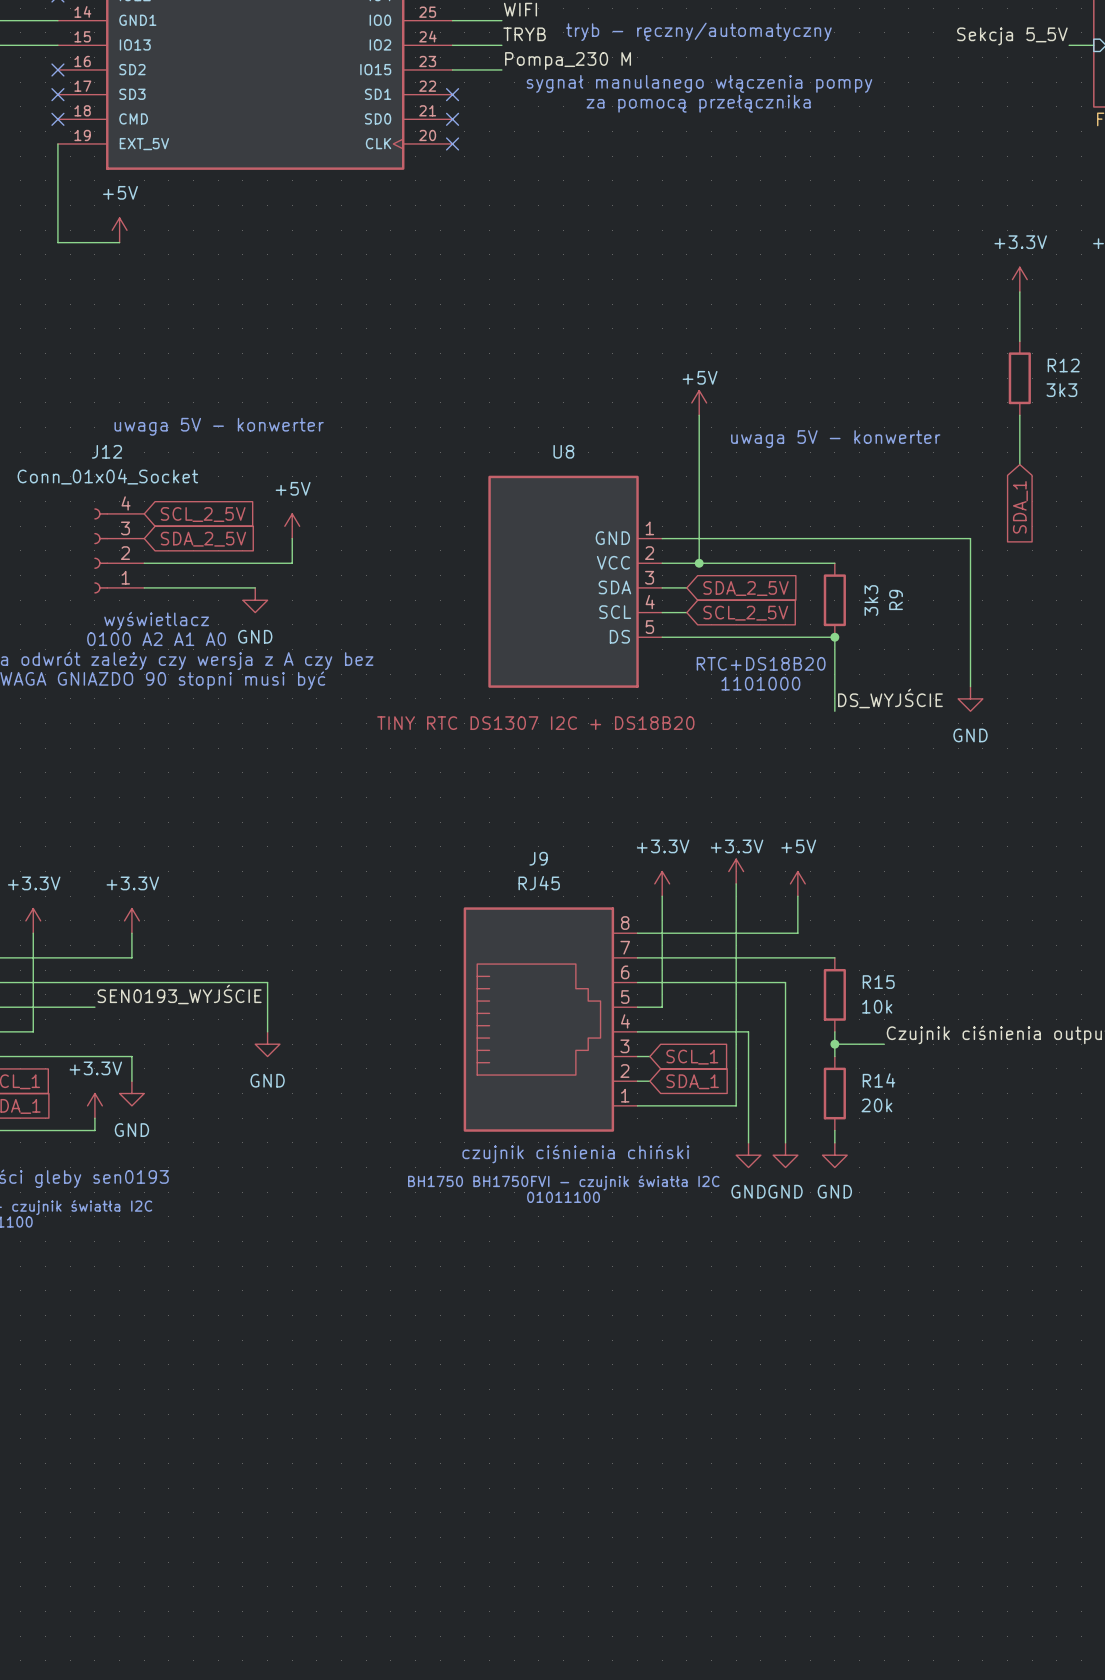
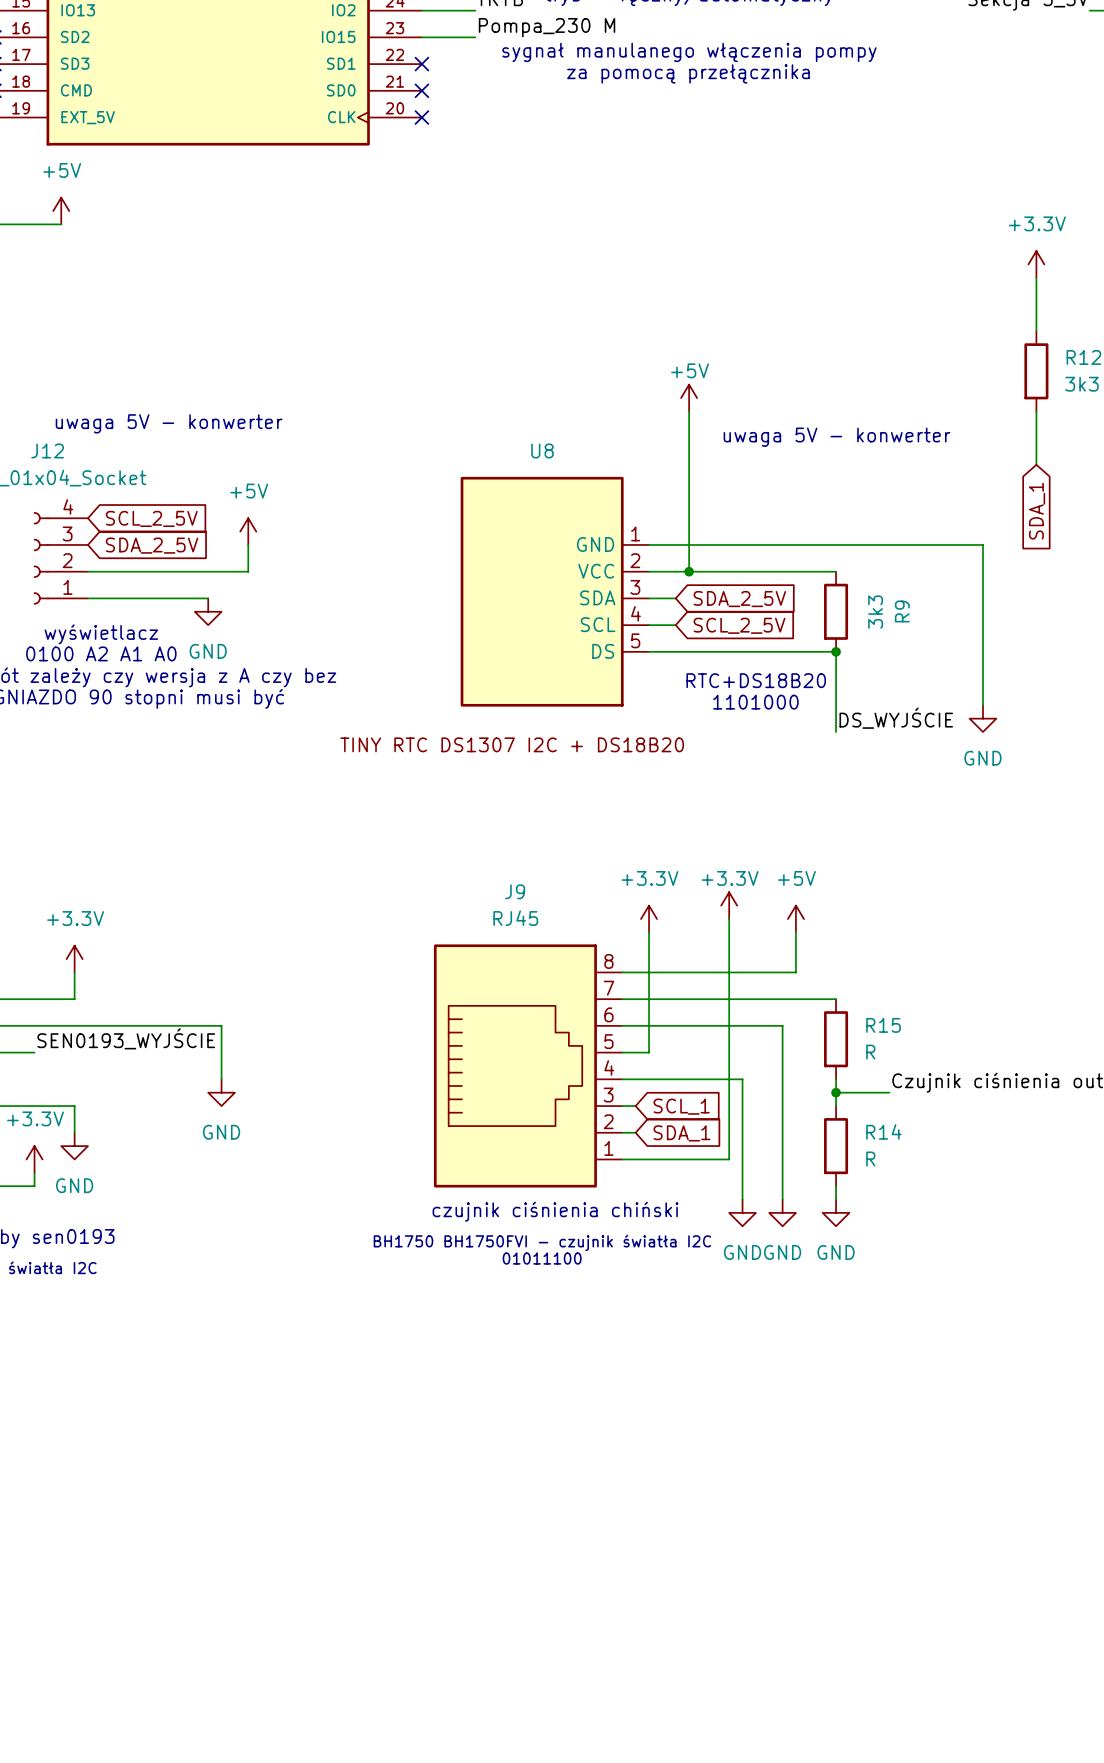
R15 value: 10k (877, 1006) -> R (870, 1052)
R14 value: 20k (876, 1105) -> R (870, 1158)

